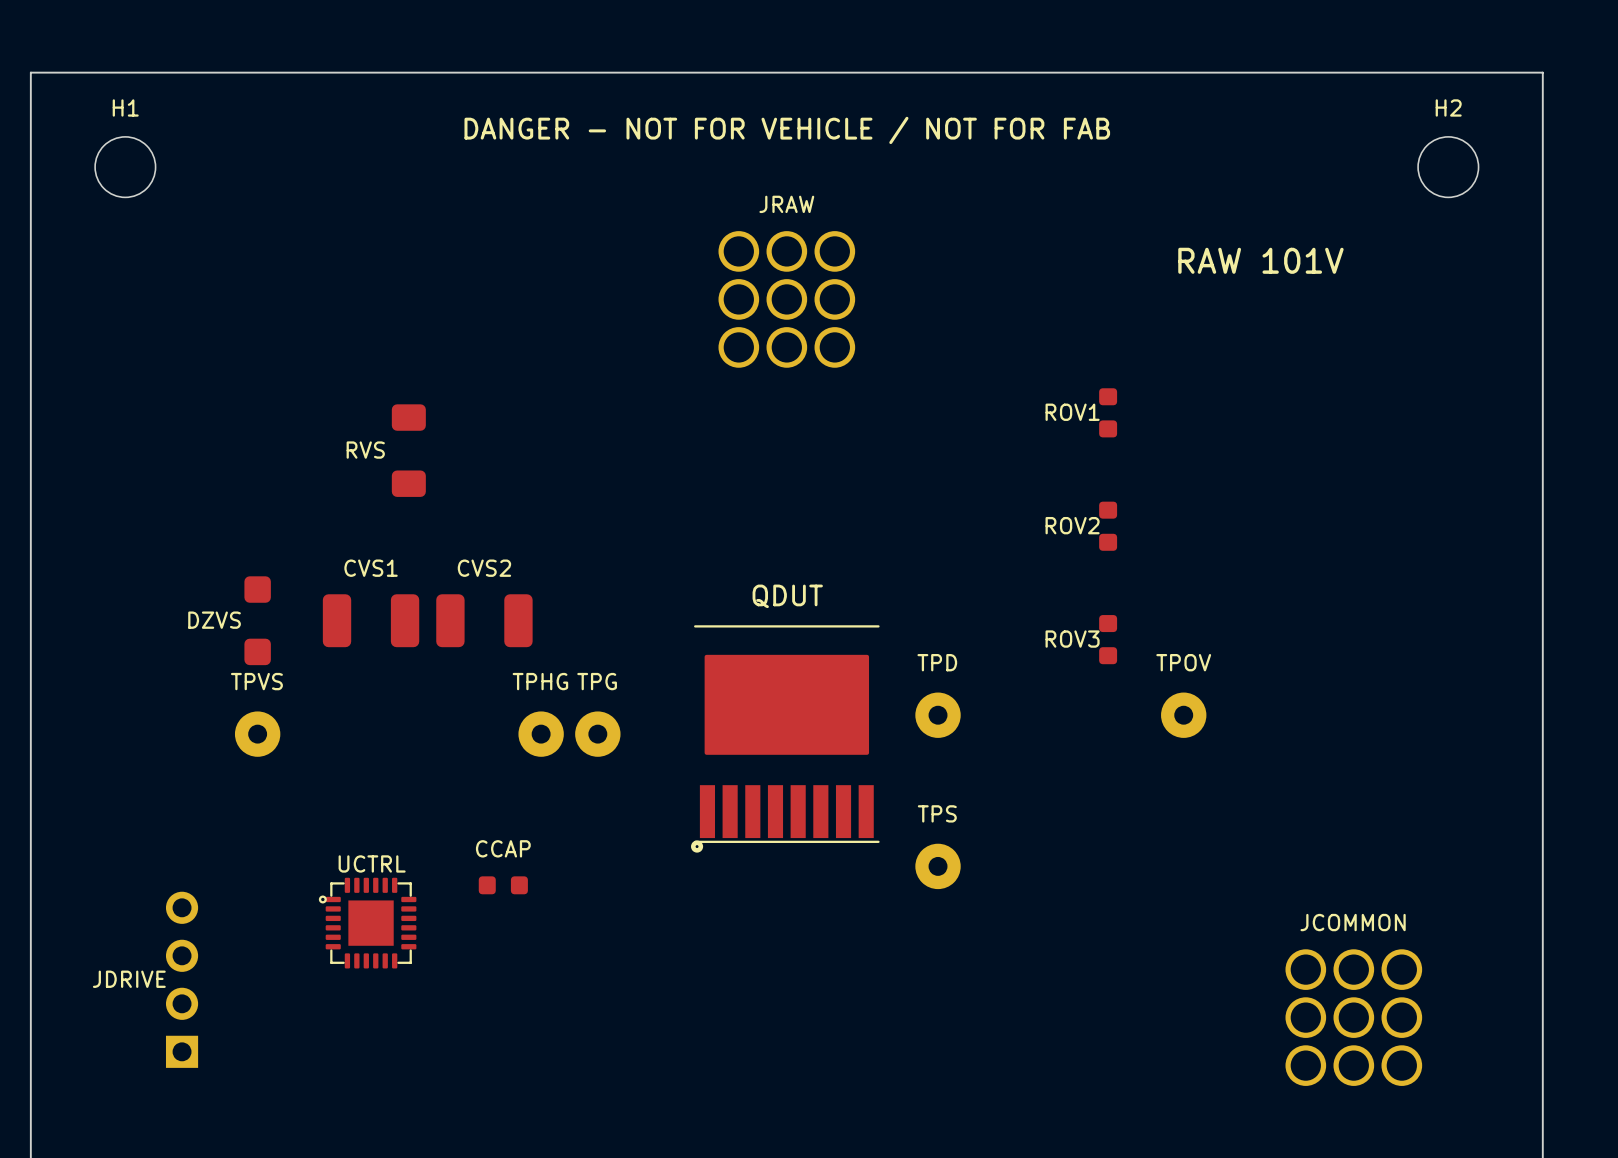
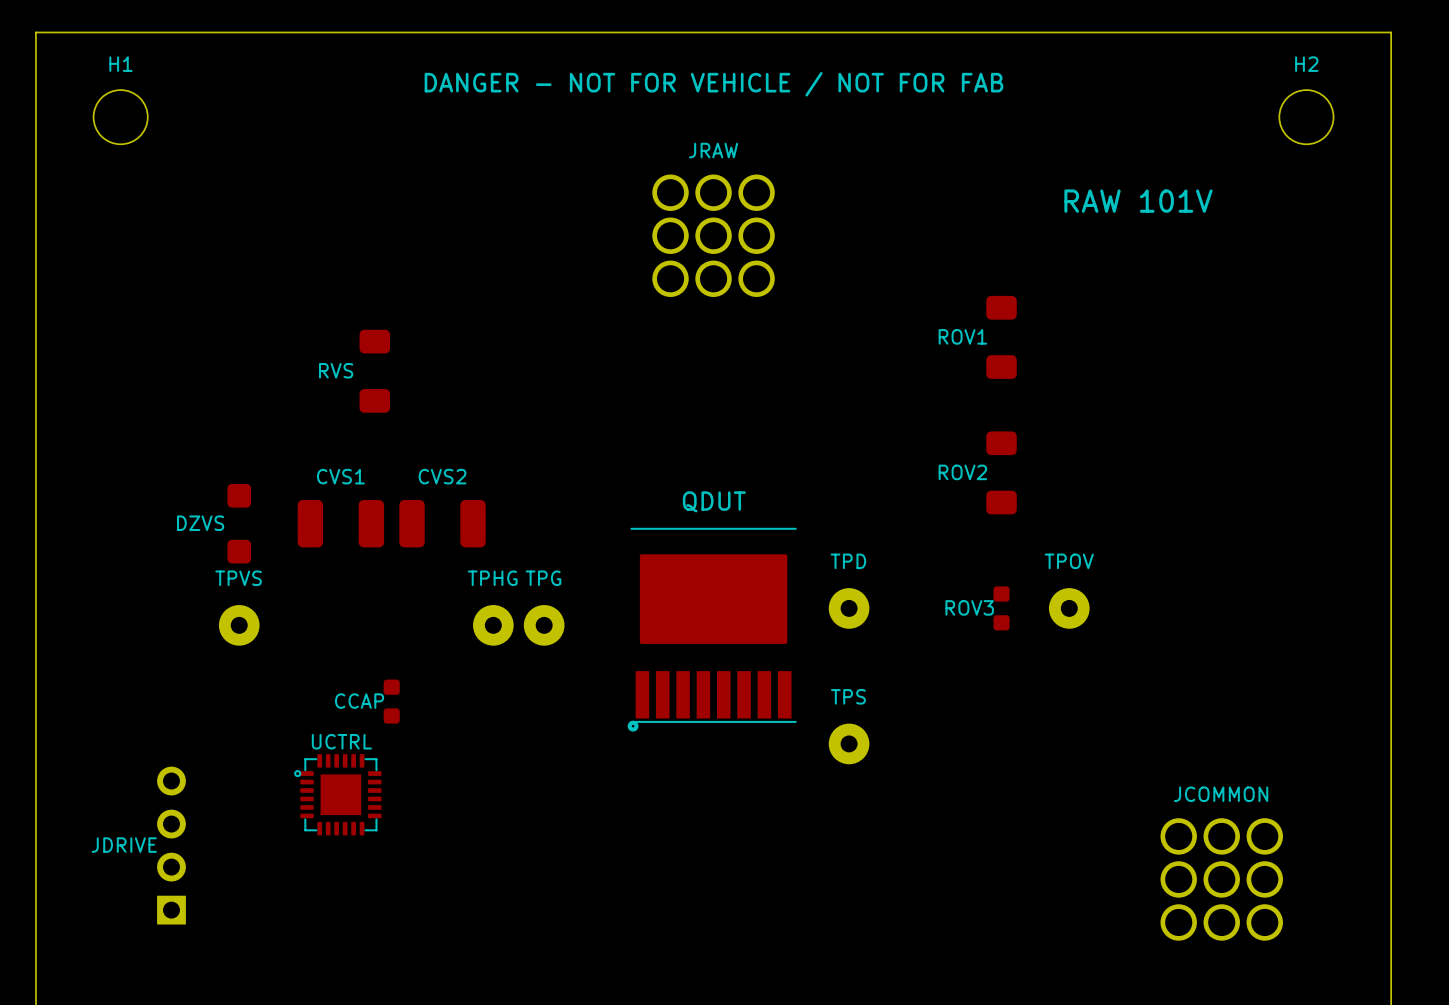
ROV1 footprint: [1099, 388, 1118, 438] -> [986, 295, 1017, 379]
ROV2 footprint: [1099, 501, 1118, 551] -> [986, 431, 1017, 515]
ROV3 position: (1108, 639) -> (1001, 608)
CCAP name position: CCAP (503, 848) -> CCAP (359, 701)
CCAP rotation: 0° (503, 885) -> 90° clockwise (391, 701)
CCAP position: (503, 885) -> (391, 701)

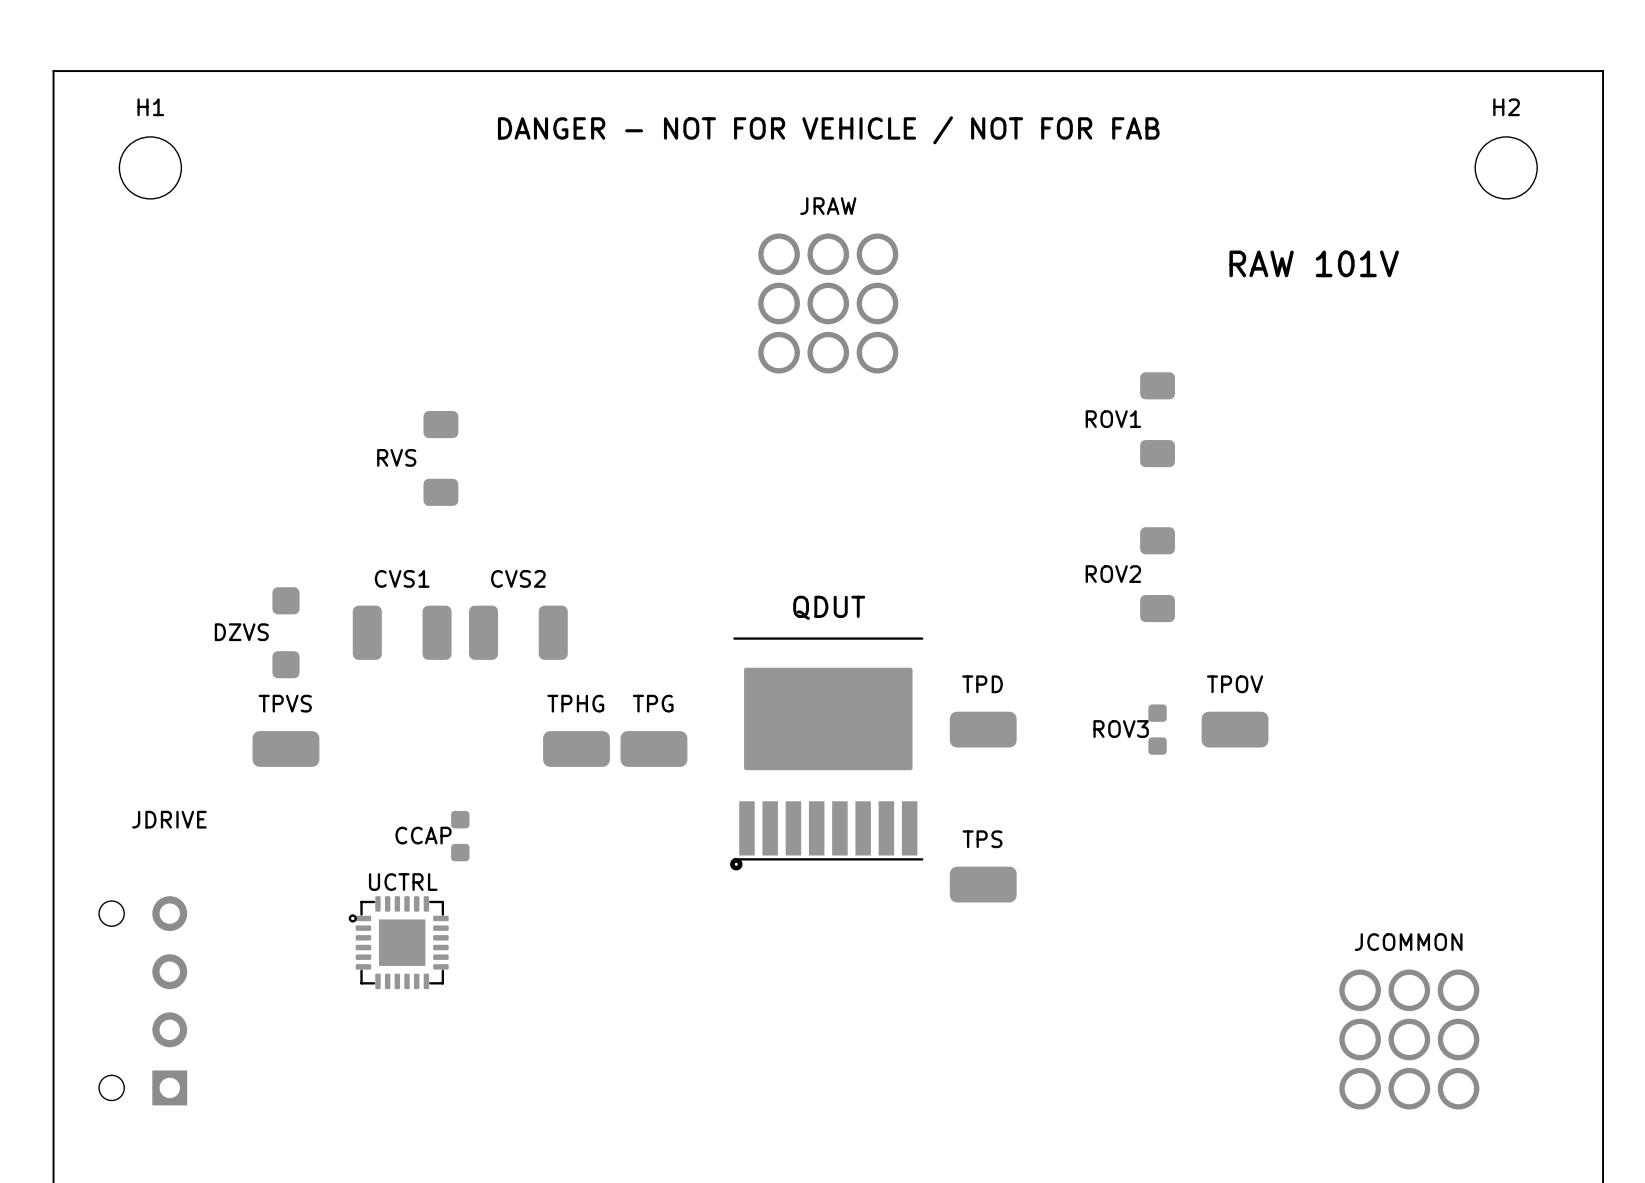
TPD footprint: [828, 588, 870, 629] -> [949, 711, 1017, 748]
TPOV footprint: [1048, 588, 1090, 629] -> [1201, 711, 1269, 748]
TPVS footprint: [218, 605, 260, 646] -> [252, 731, 320, 767]
TPHG footprint: [473, 605, 514, 646] -> [543, 731, 610, 767]
TPG footprint: [523, 605, 565, 646] -> [620, 731, 688, 767]
TPS footprint: [828, 723, 870, 765] -> [949, 866, 1017, 903]
JDRIVE: none -> (143, 1000)
JDRIVE: (171, 845) -> none

